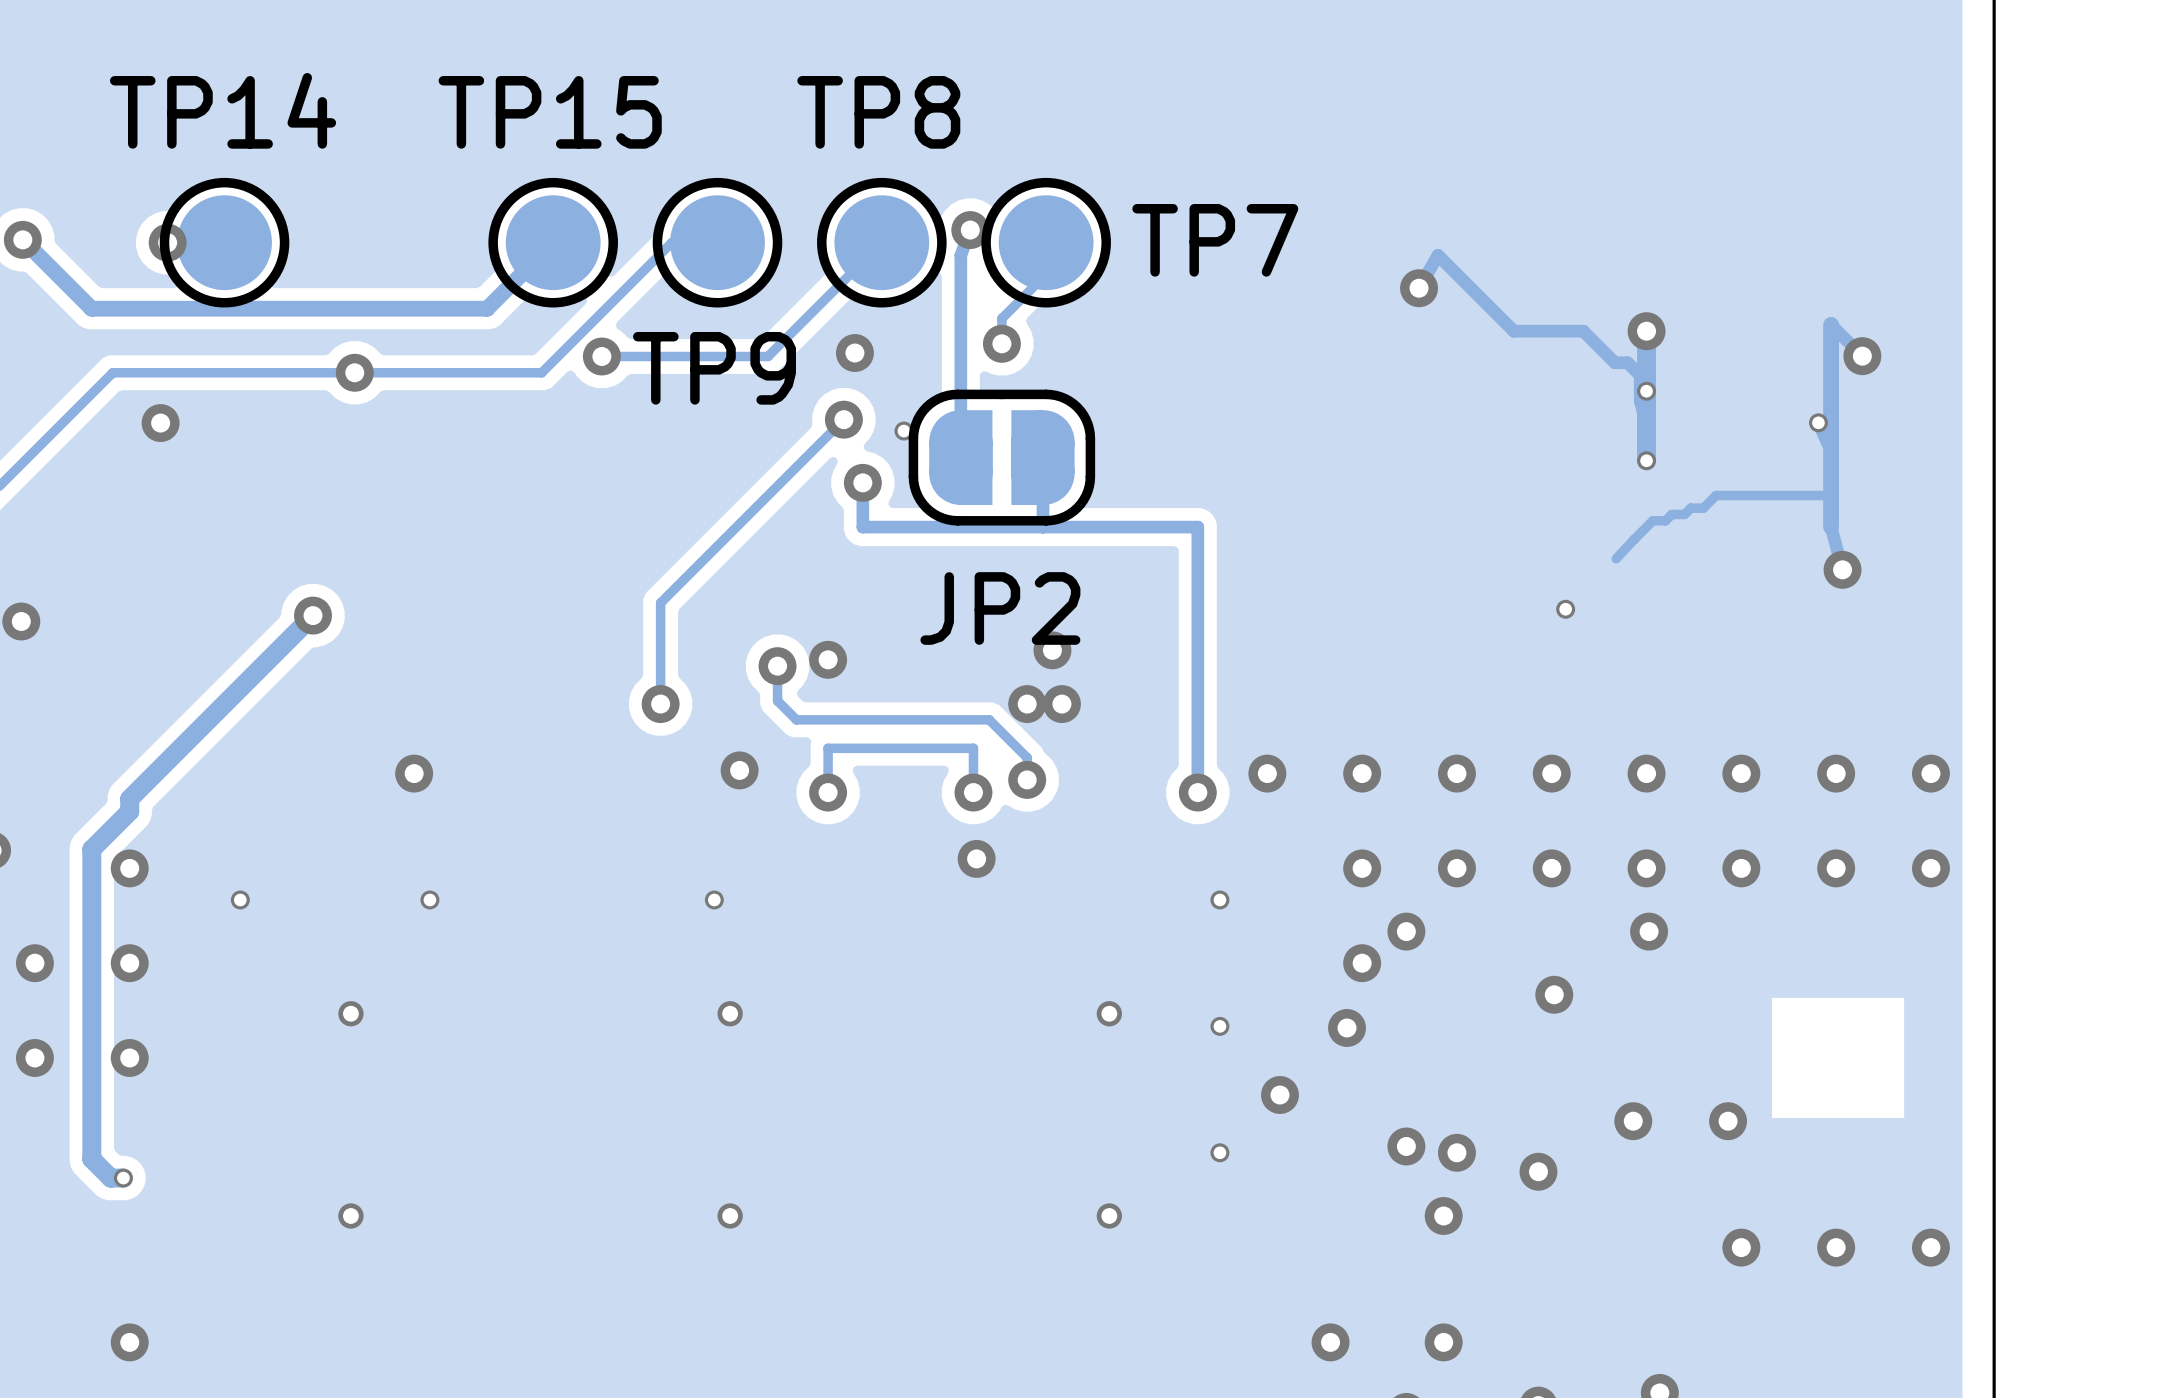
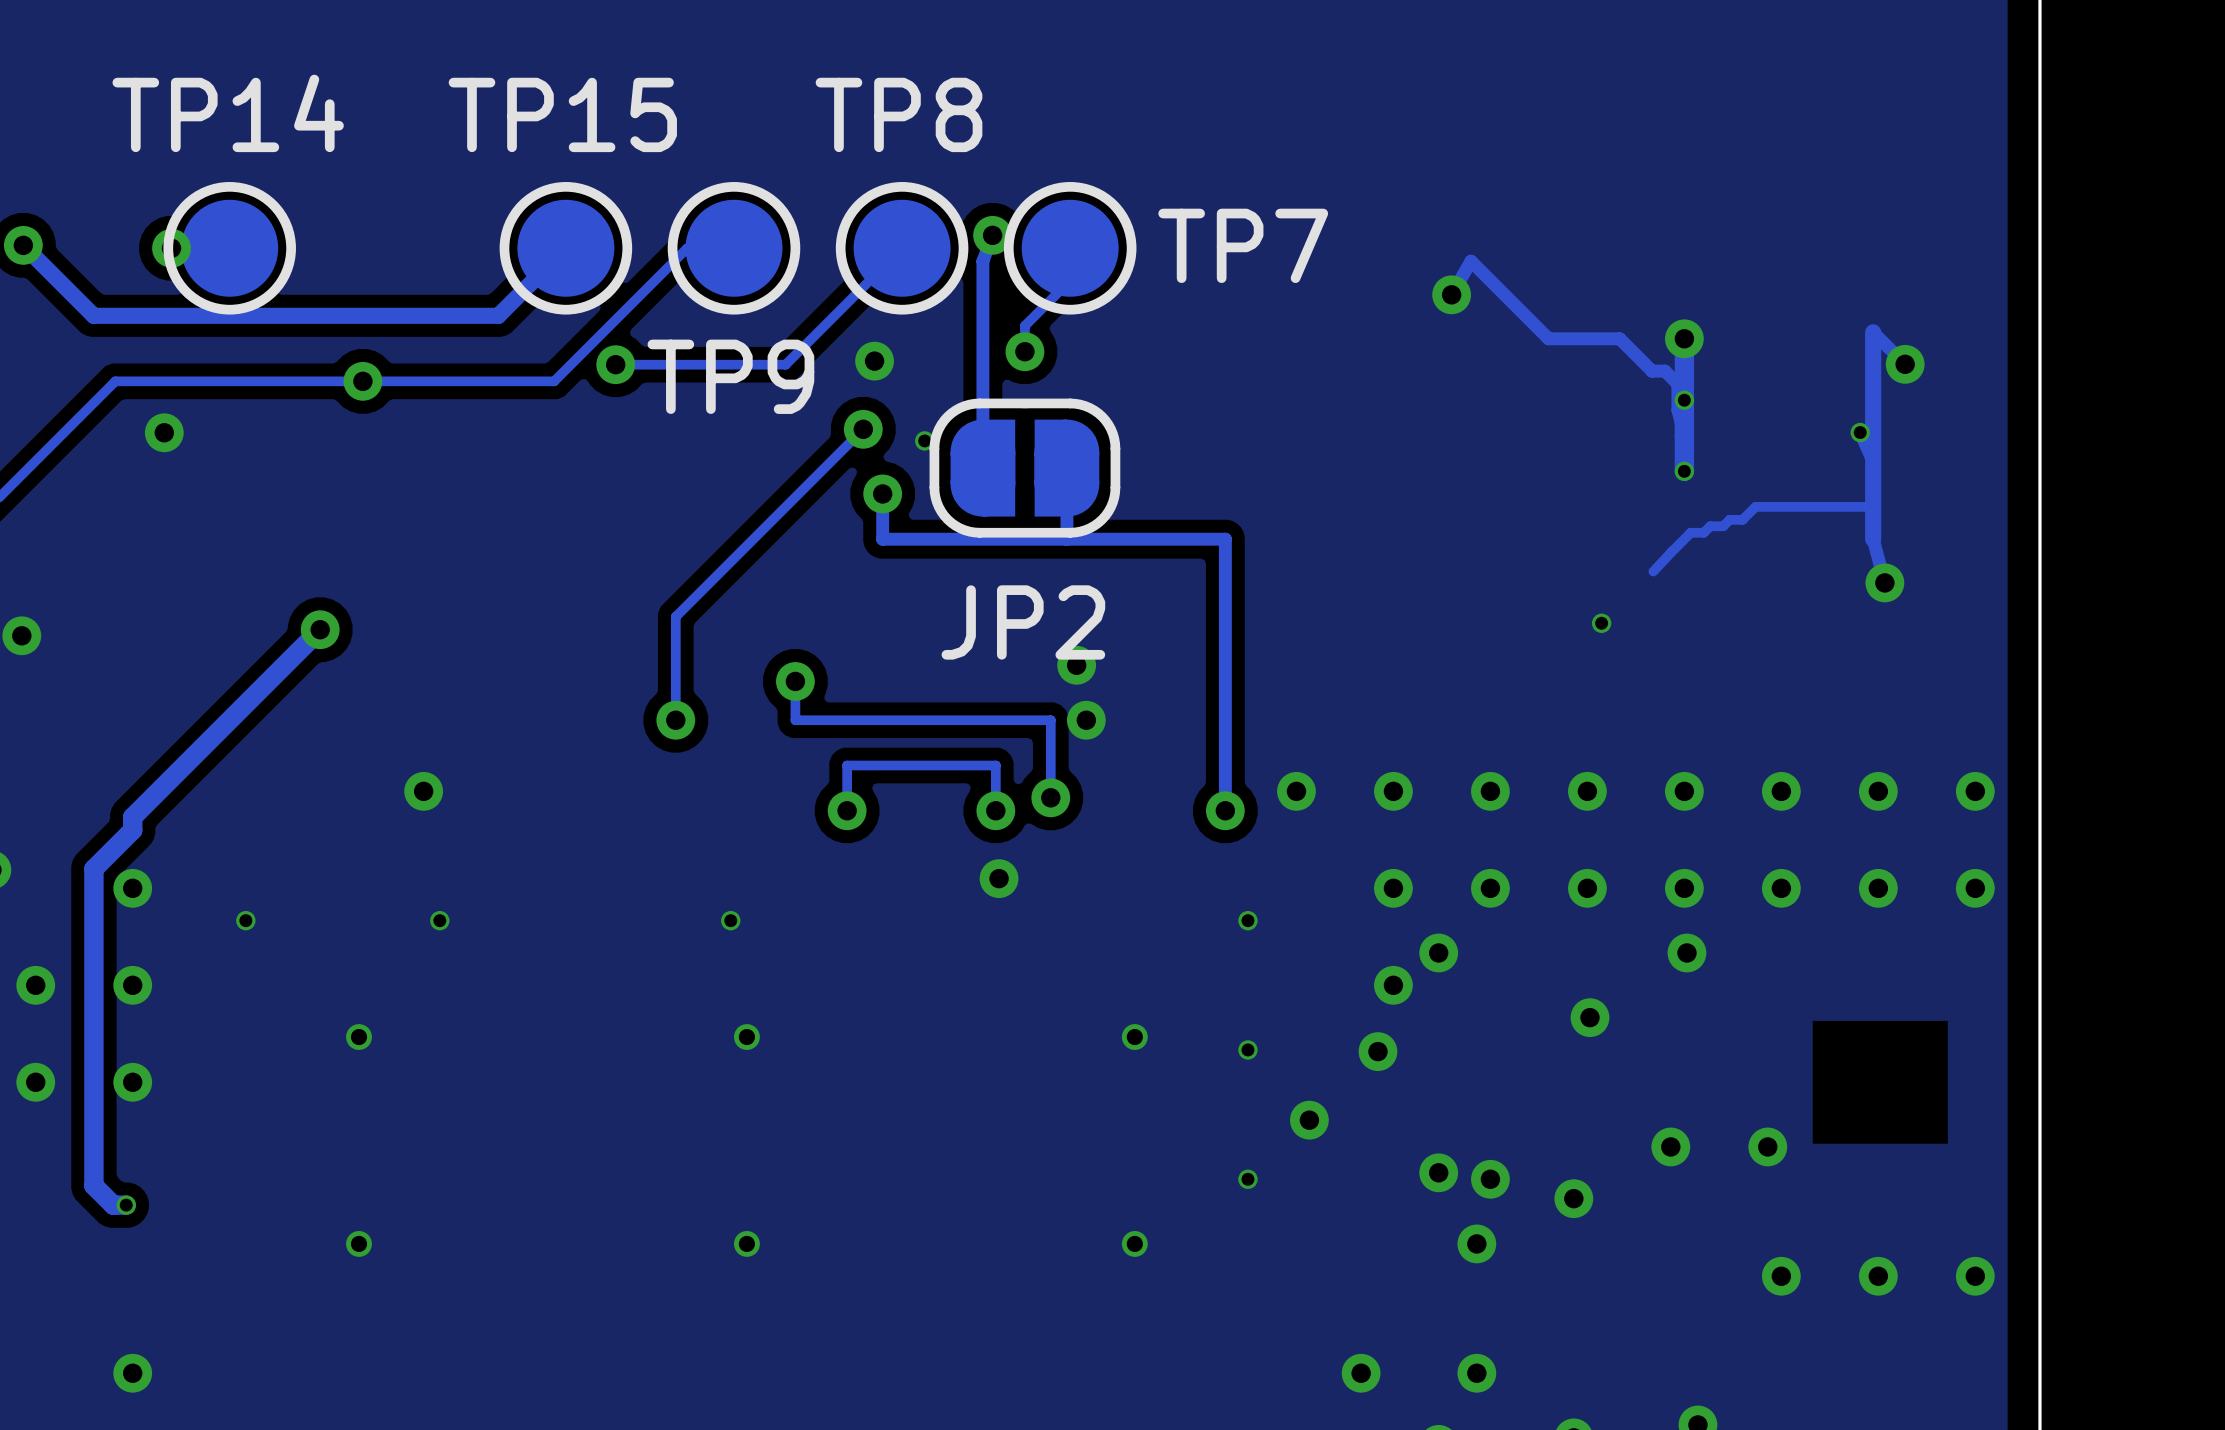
via: (828, 659) -> none
track: (777, 700) (796, 719) (989, 719) (1027, 757) -> (795, 717) (795, 720) (1050, 720) (1050, 775)
via: (1027, 704) -> none
via: (739, 770) -> none

